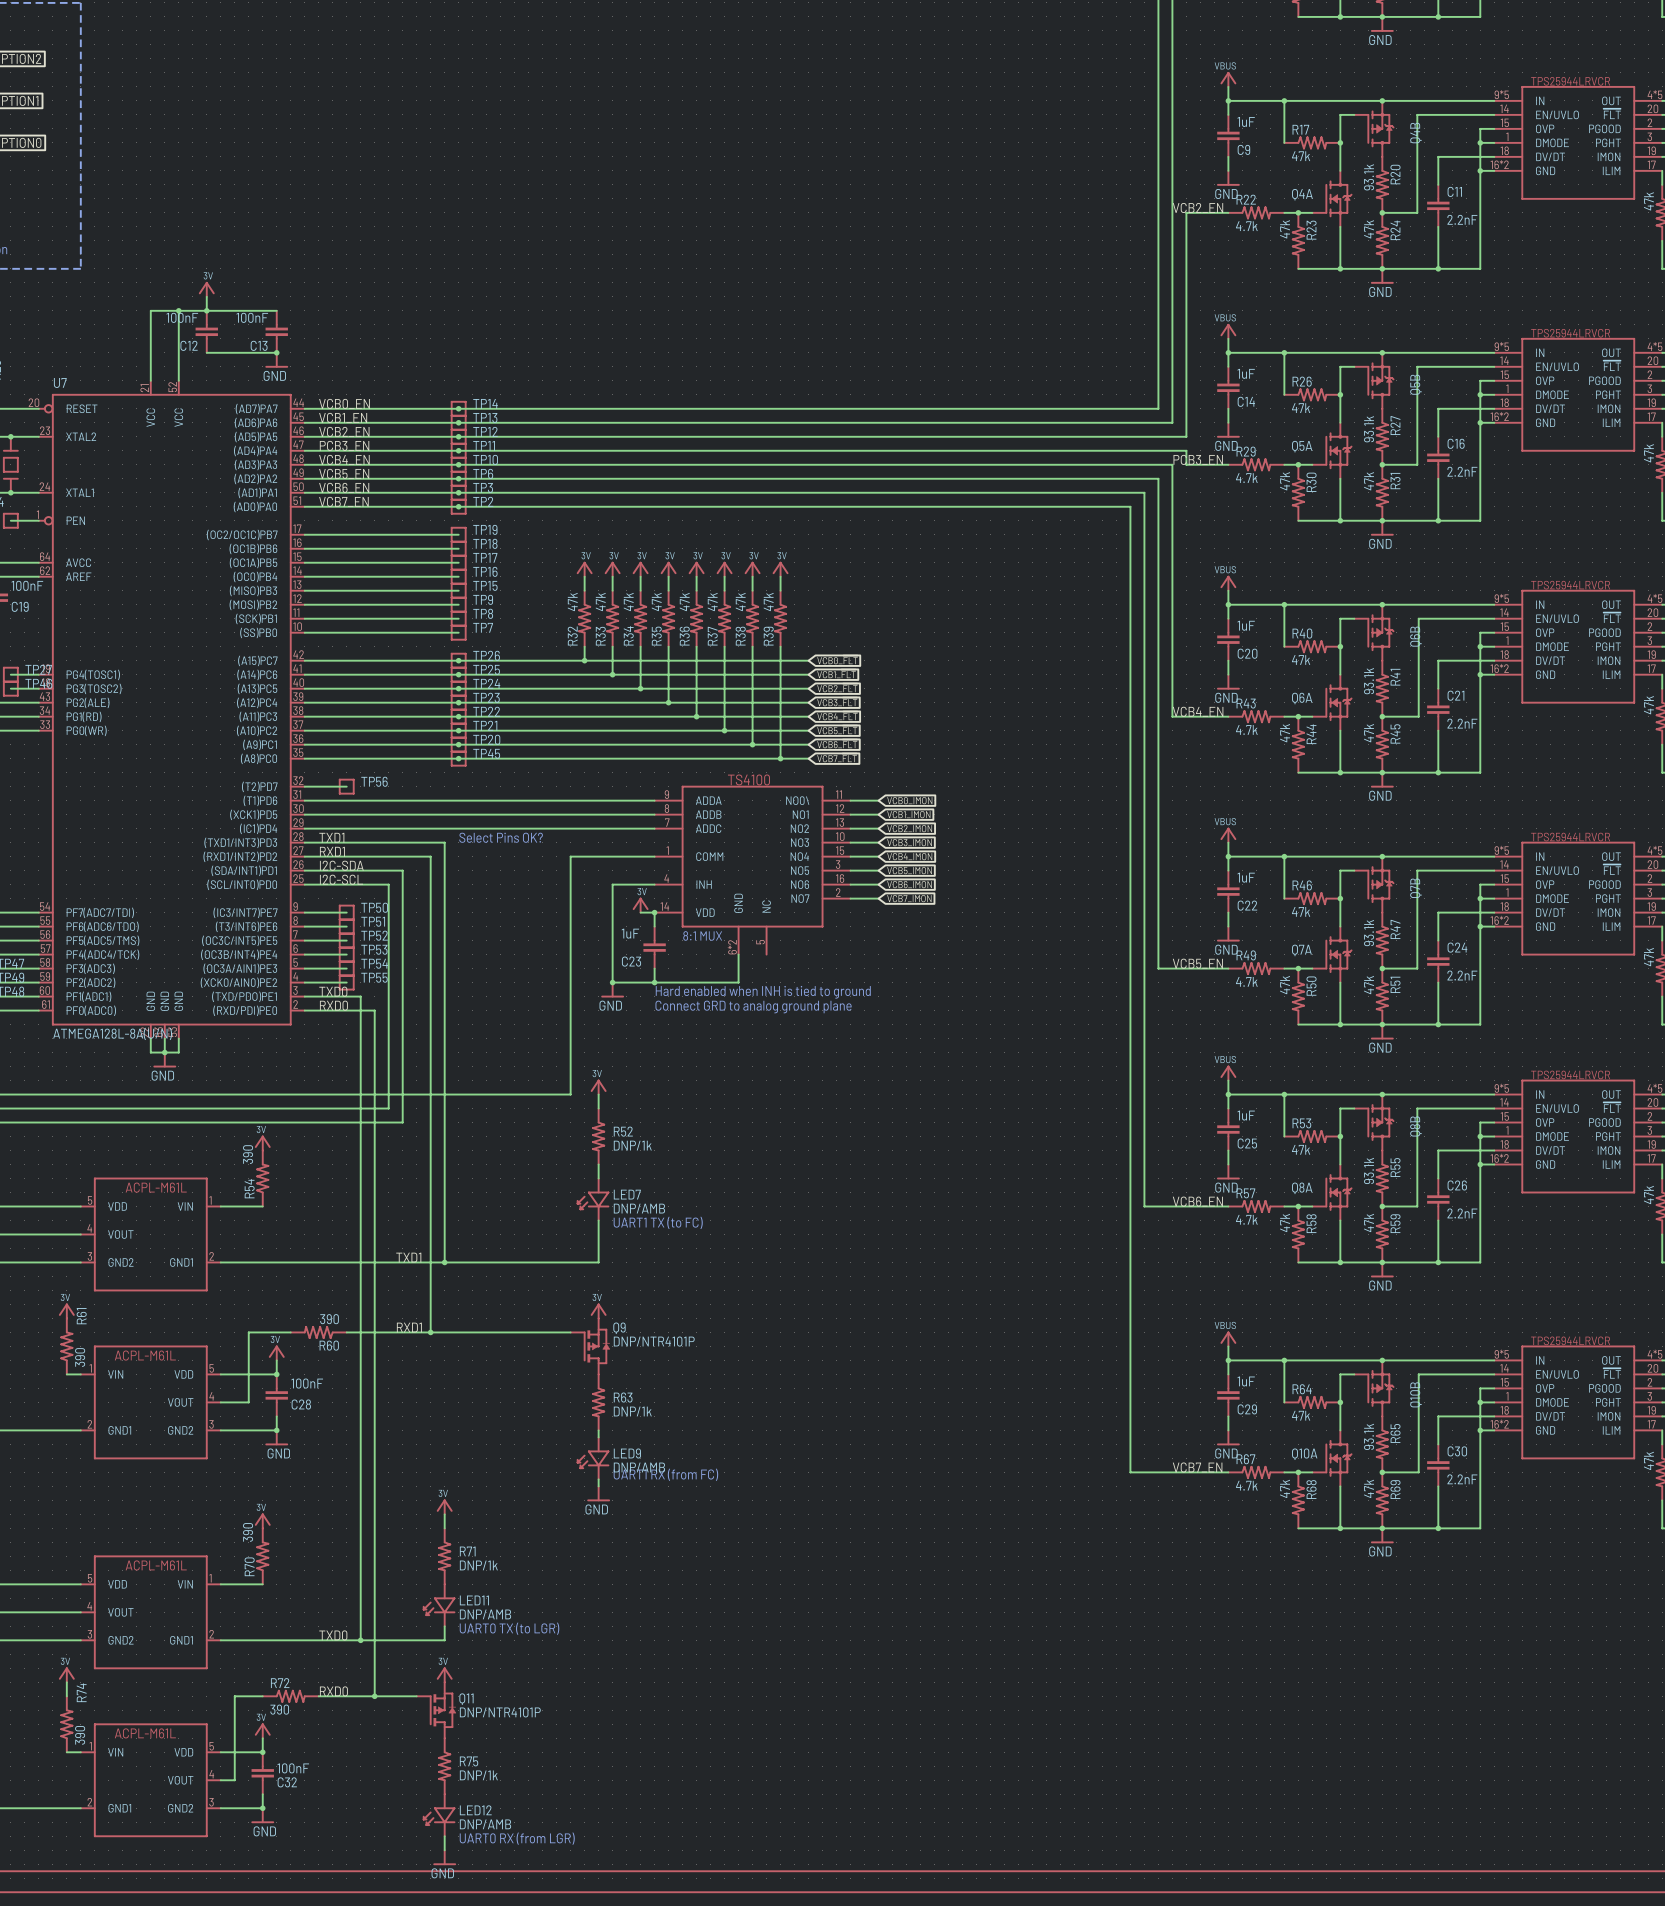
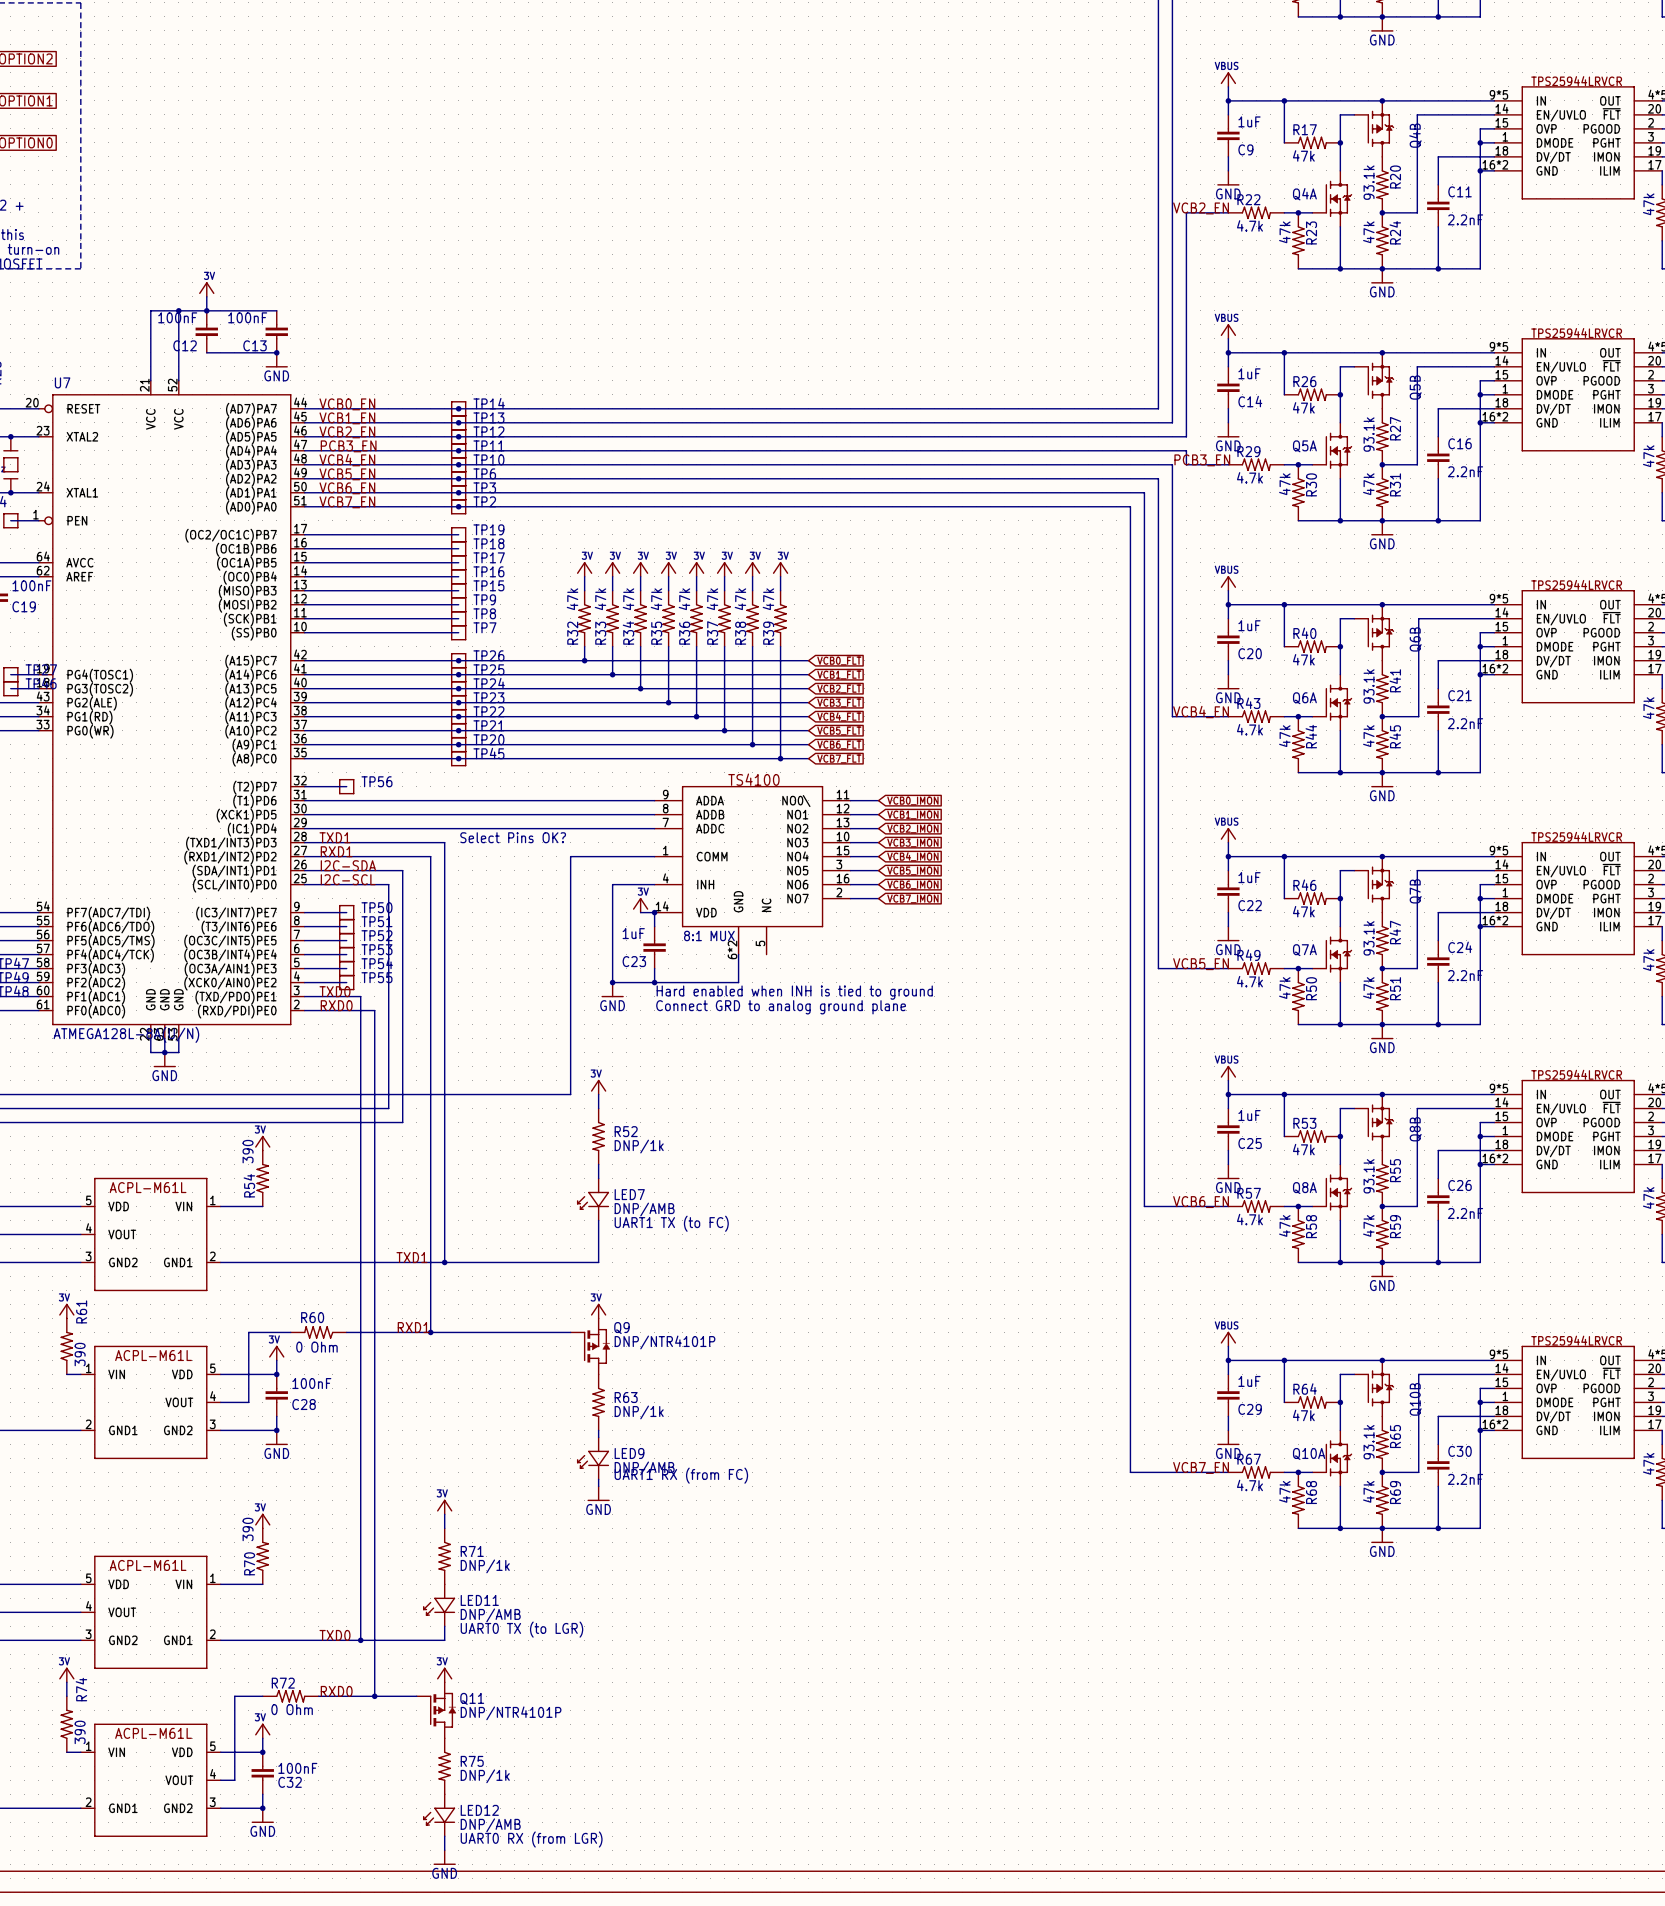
R60 value: 390 (329, 1319) -> 0 Ohm (316, 1347)
R60 name position: R60 (329, 1345) -> R60 (312, 1317)
R72 value: 390 (279, 1709) -> 0 Ohm (292, 1709)

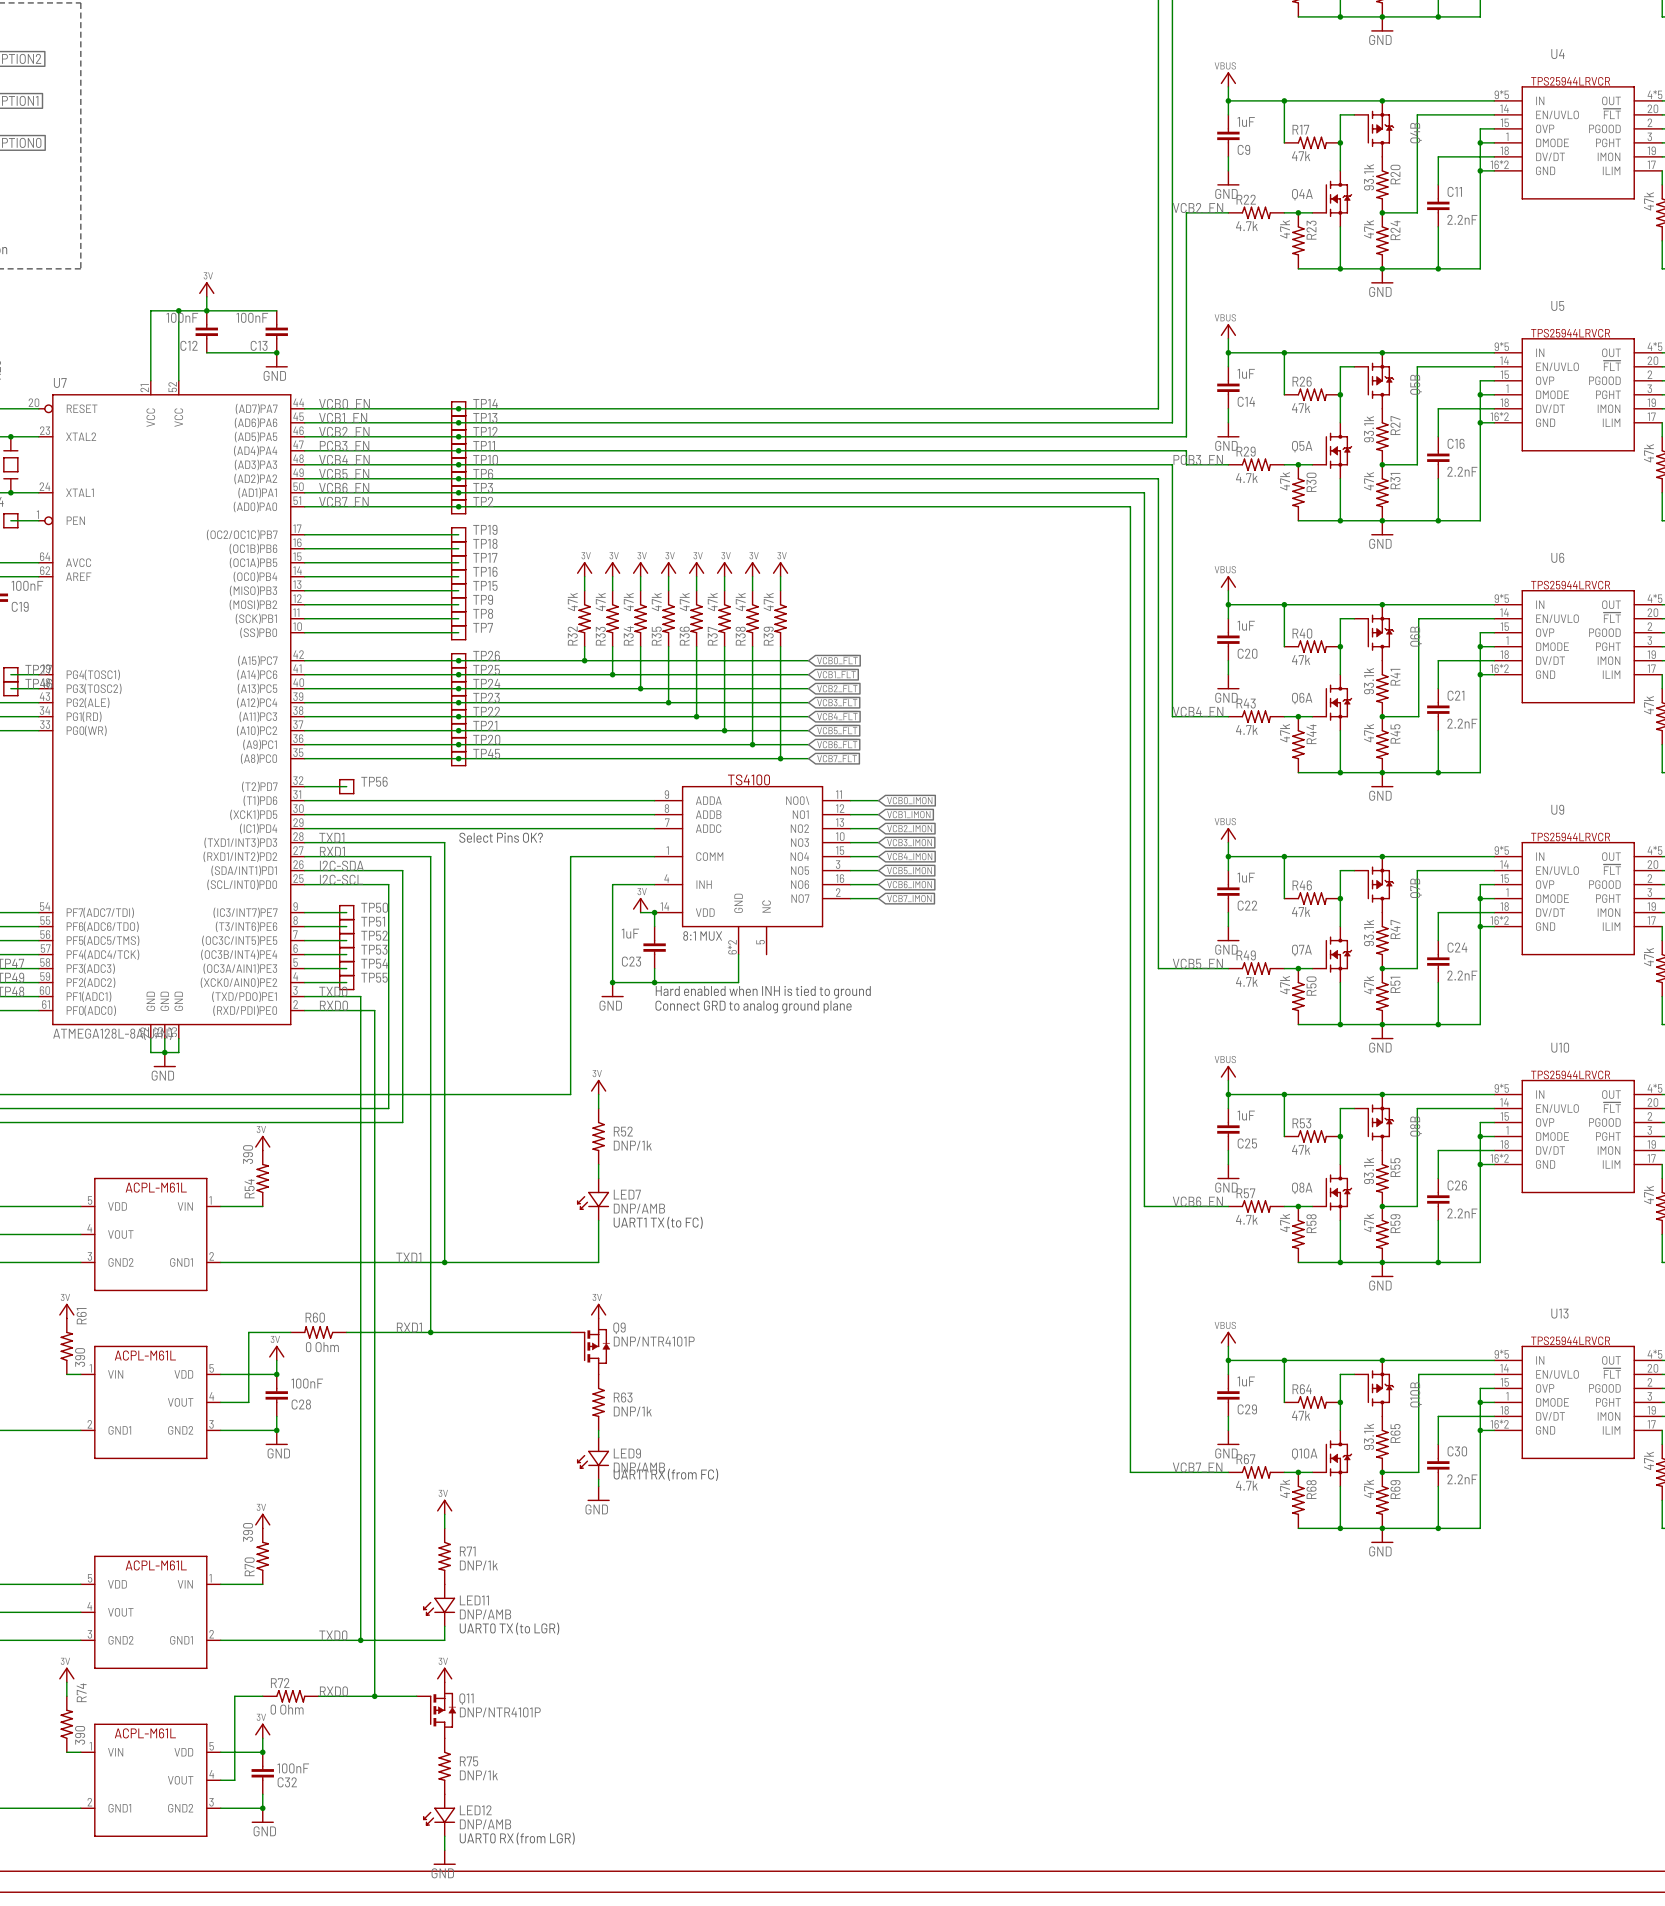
U4 name: none -> U4 (1557, 54)
U5 name: none -> U5 (1557, 305)
U6 name: none -> U6 (1557, 557)
U9 name: none -> U9 (1557, 809)
U10 name: none -> U10 (1560, 1047)
U13 name: none -> U13 (1559, 1313)

